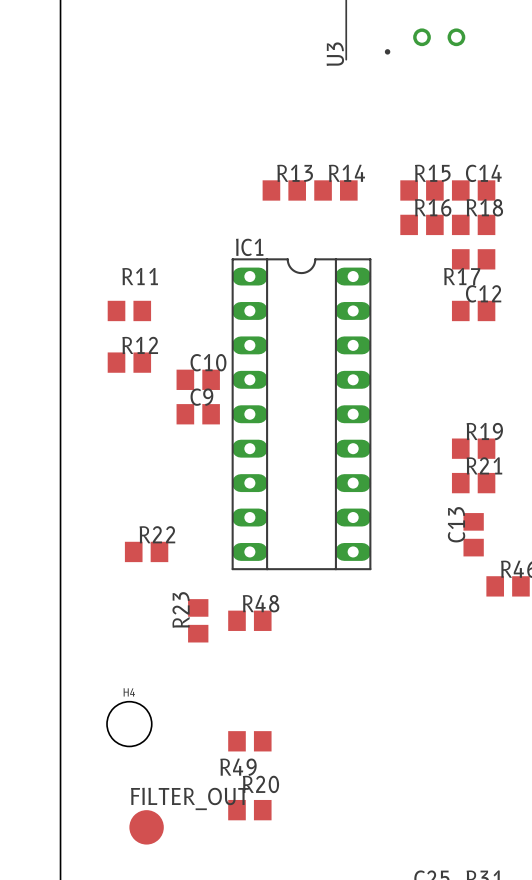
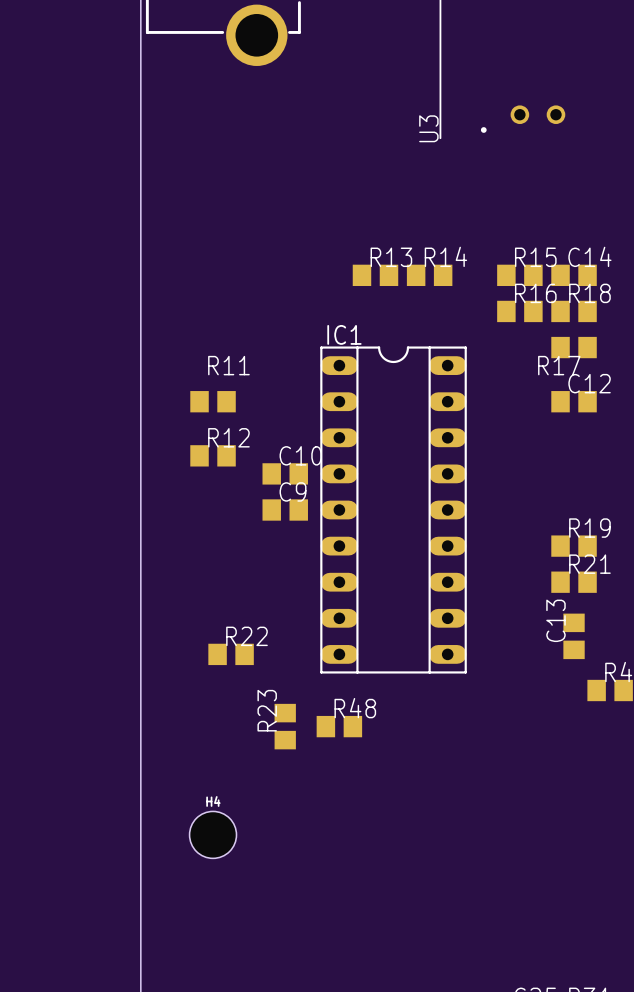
R49: (249, 741) -> none
R20: (249, 810) -> none
FILTER_OUT: (146, 827) -> none

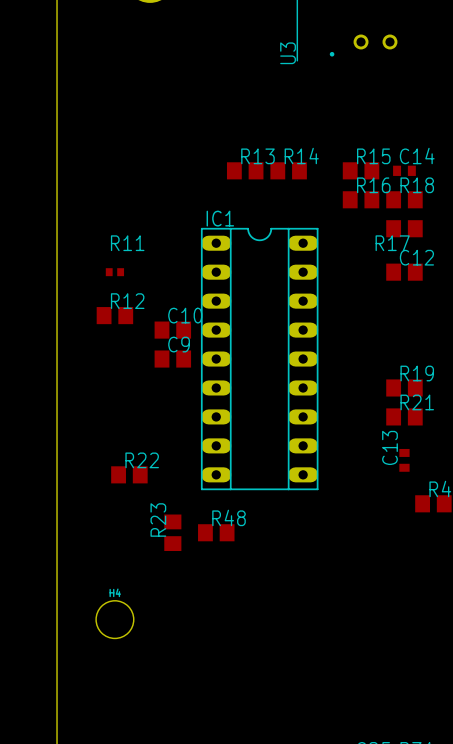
C14 footprint: [551, 264, 597, 287] -> [393, 165, 416, 176]
R11 footprint: [190, 391, 236, 413] -> [105, 268, 125, 277]
C13 footprint: [563, 613, 585, 660] -> [399, 448, 410, 472]

